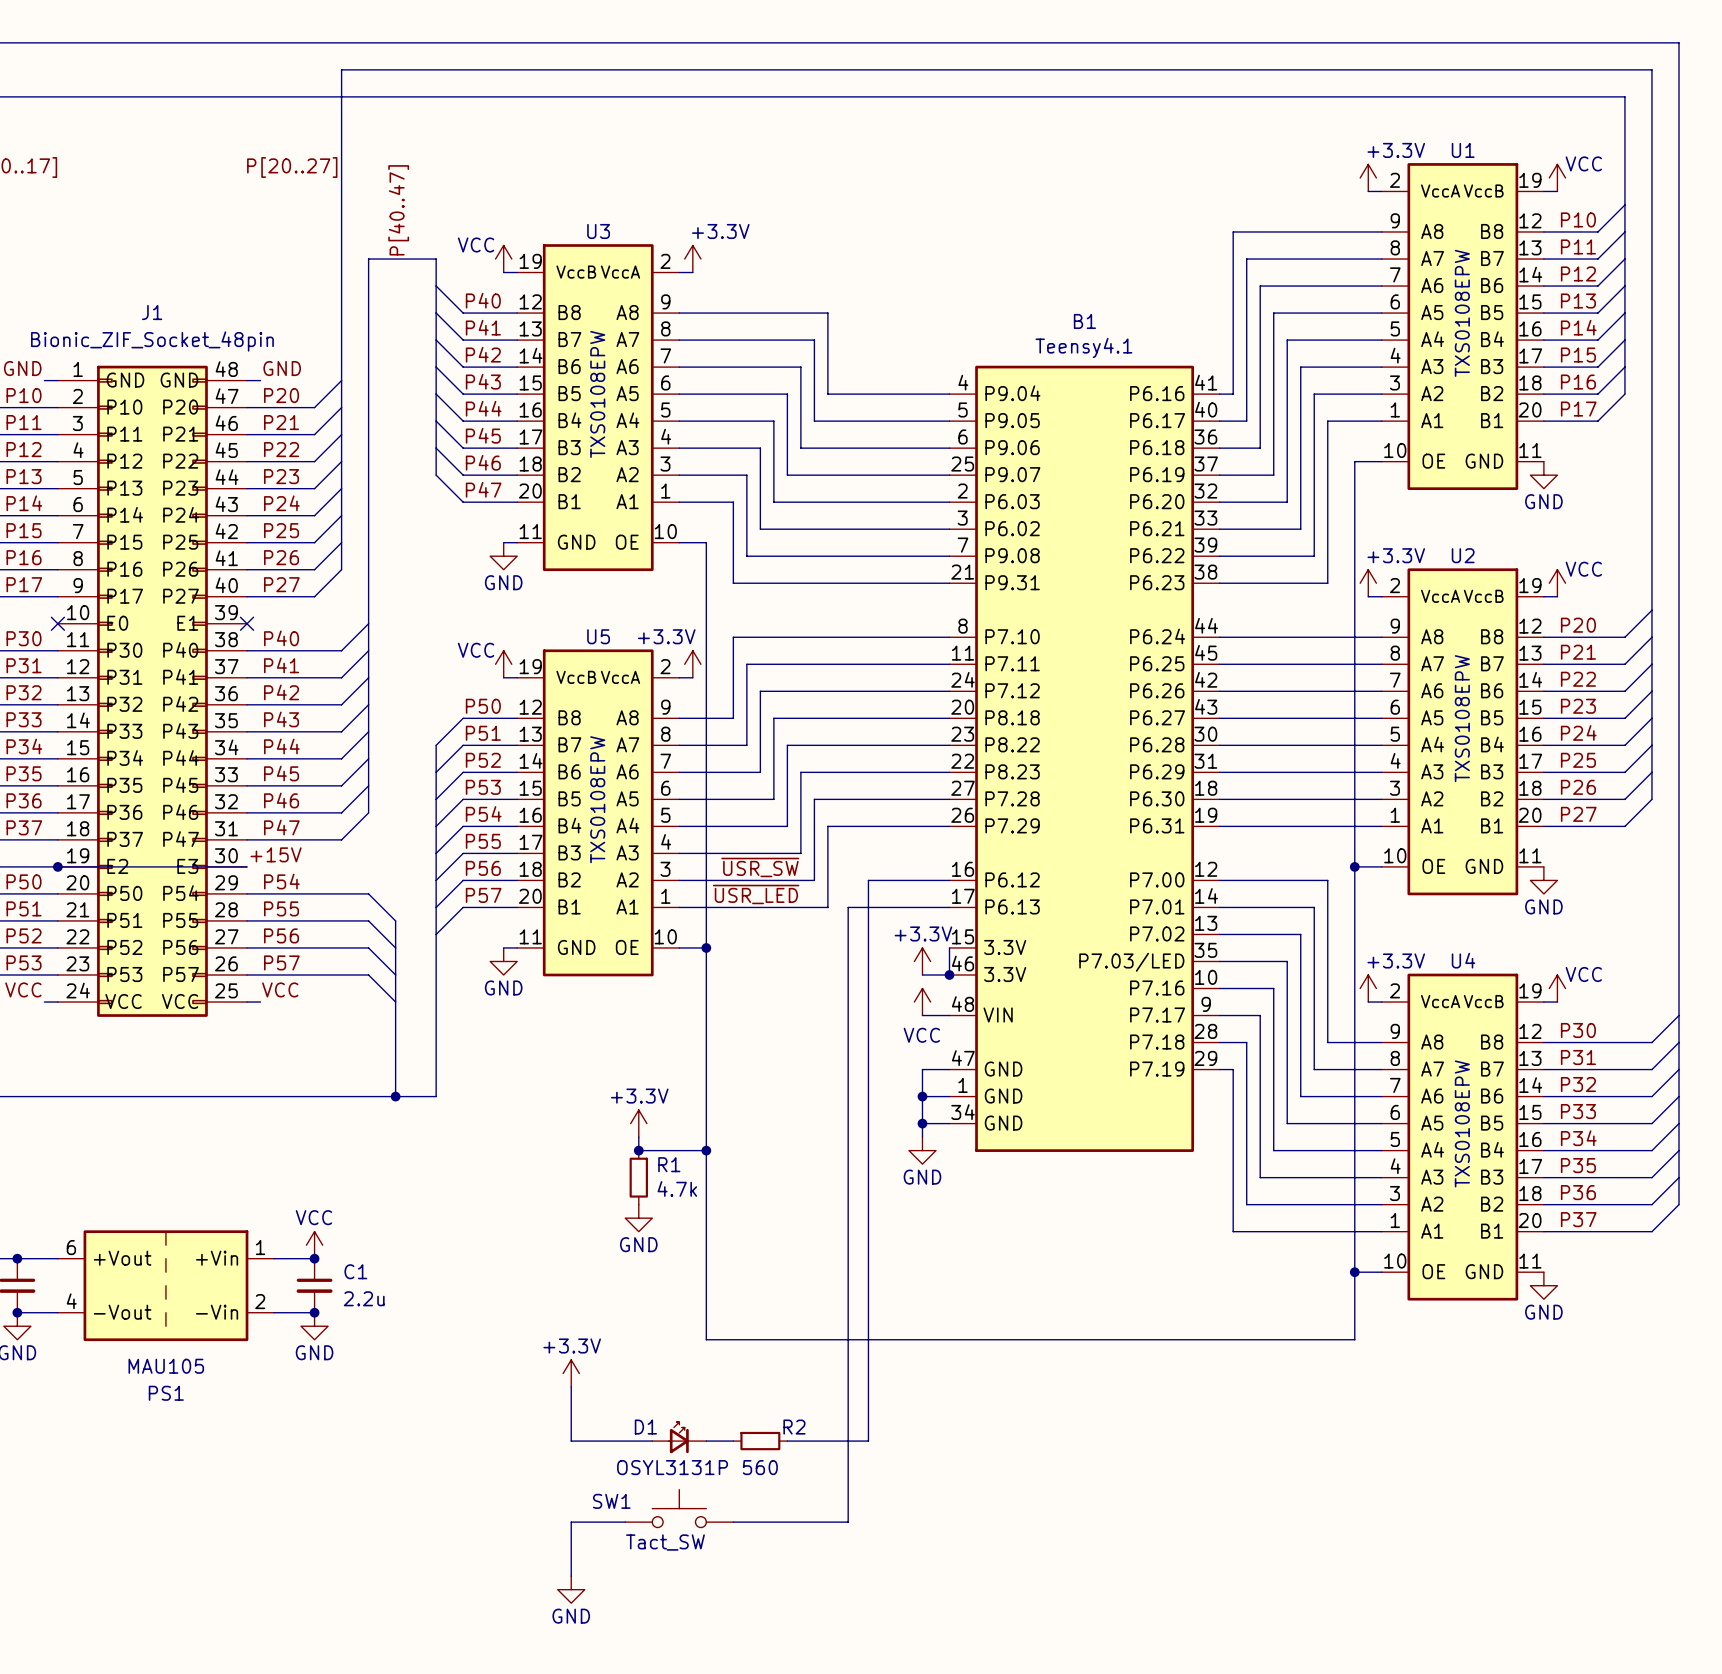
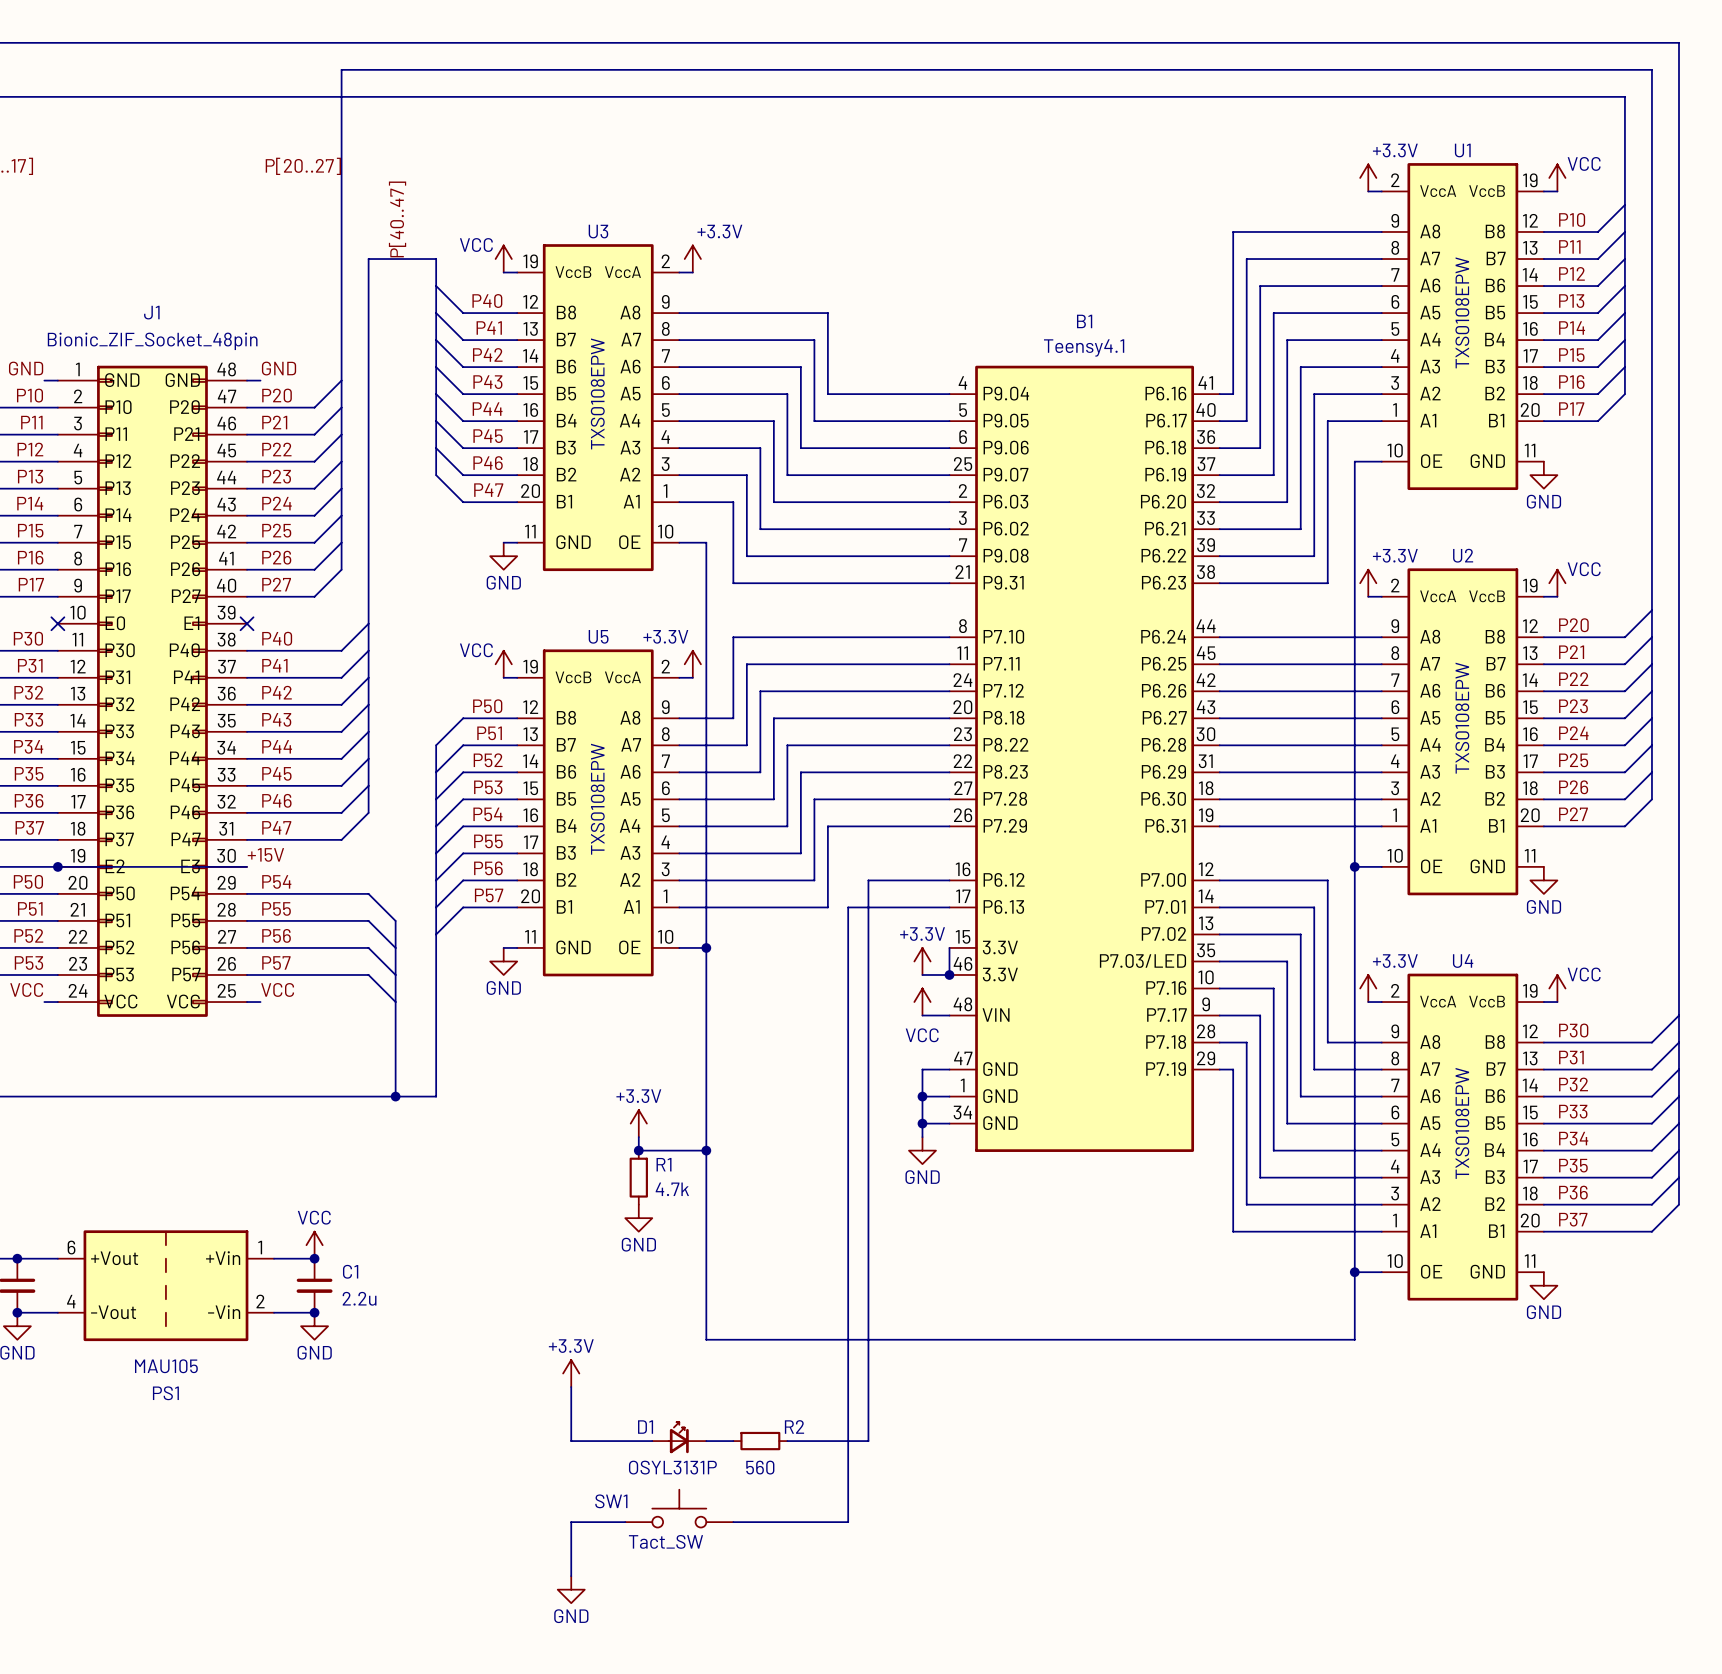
label: ~{USR_SW} (760, 867) -> none
label: ~{USR_LED} (756, 894) -> none

